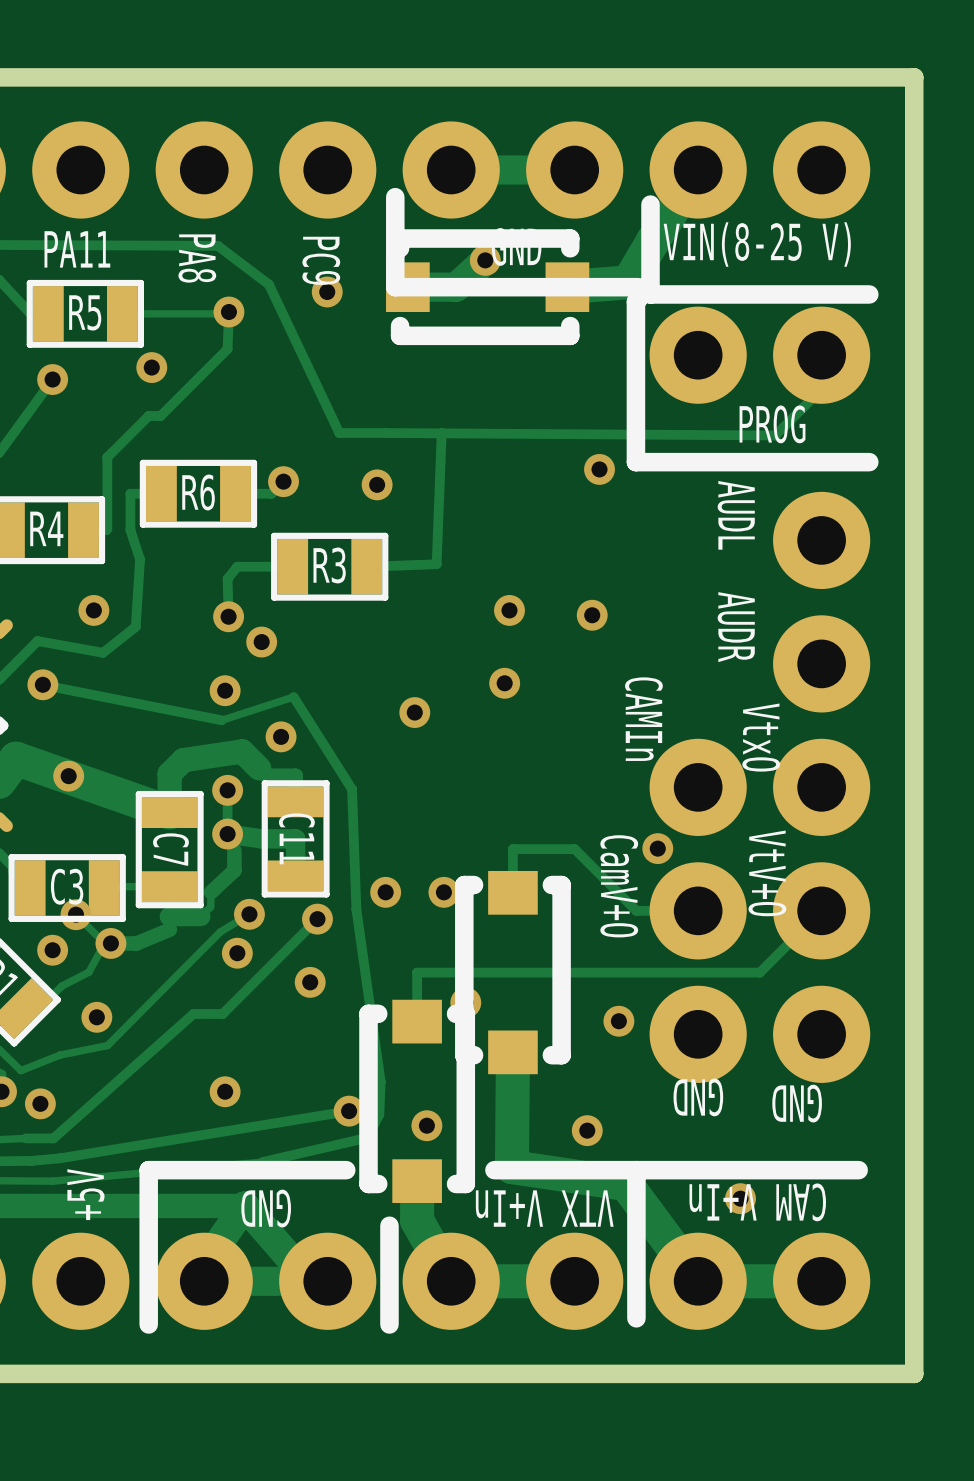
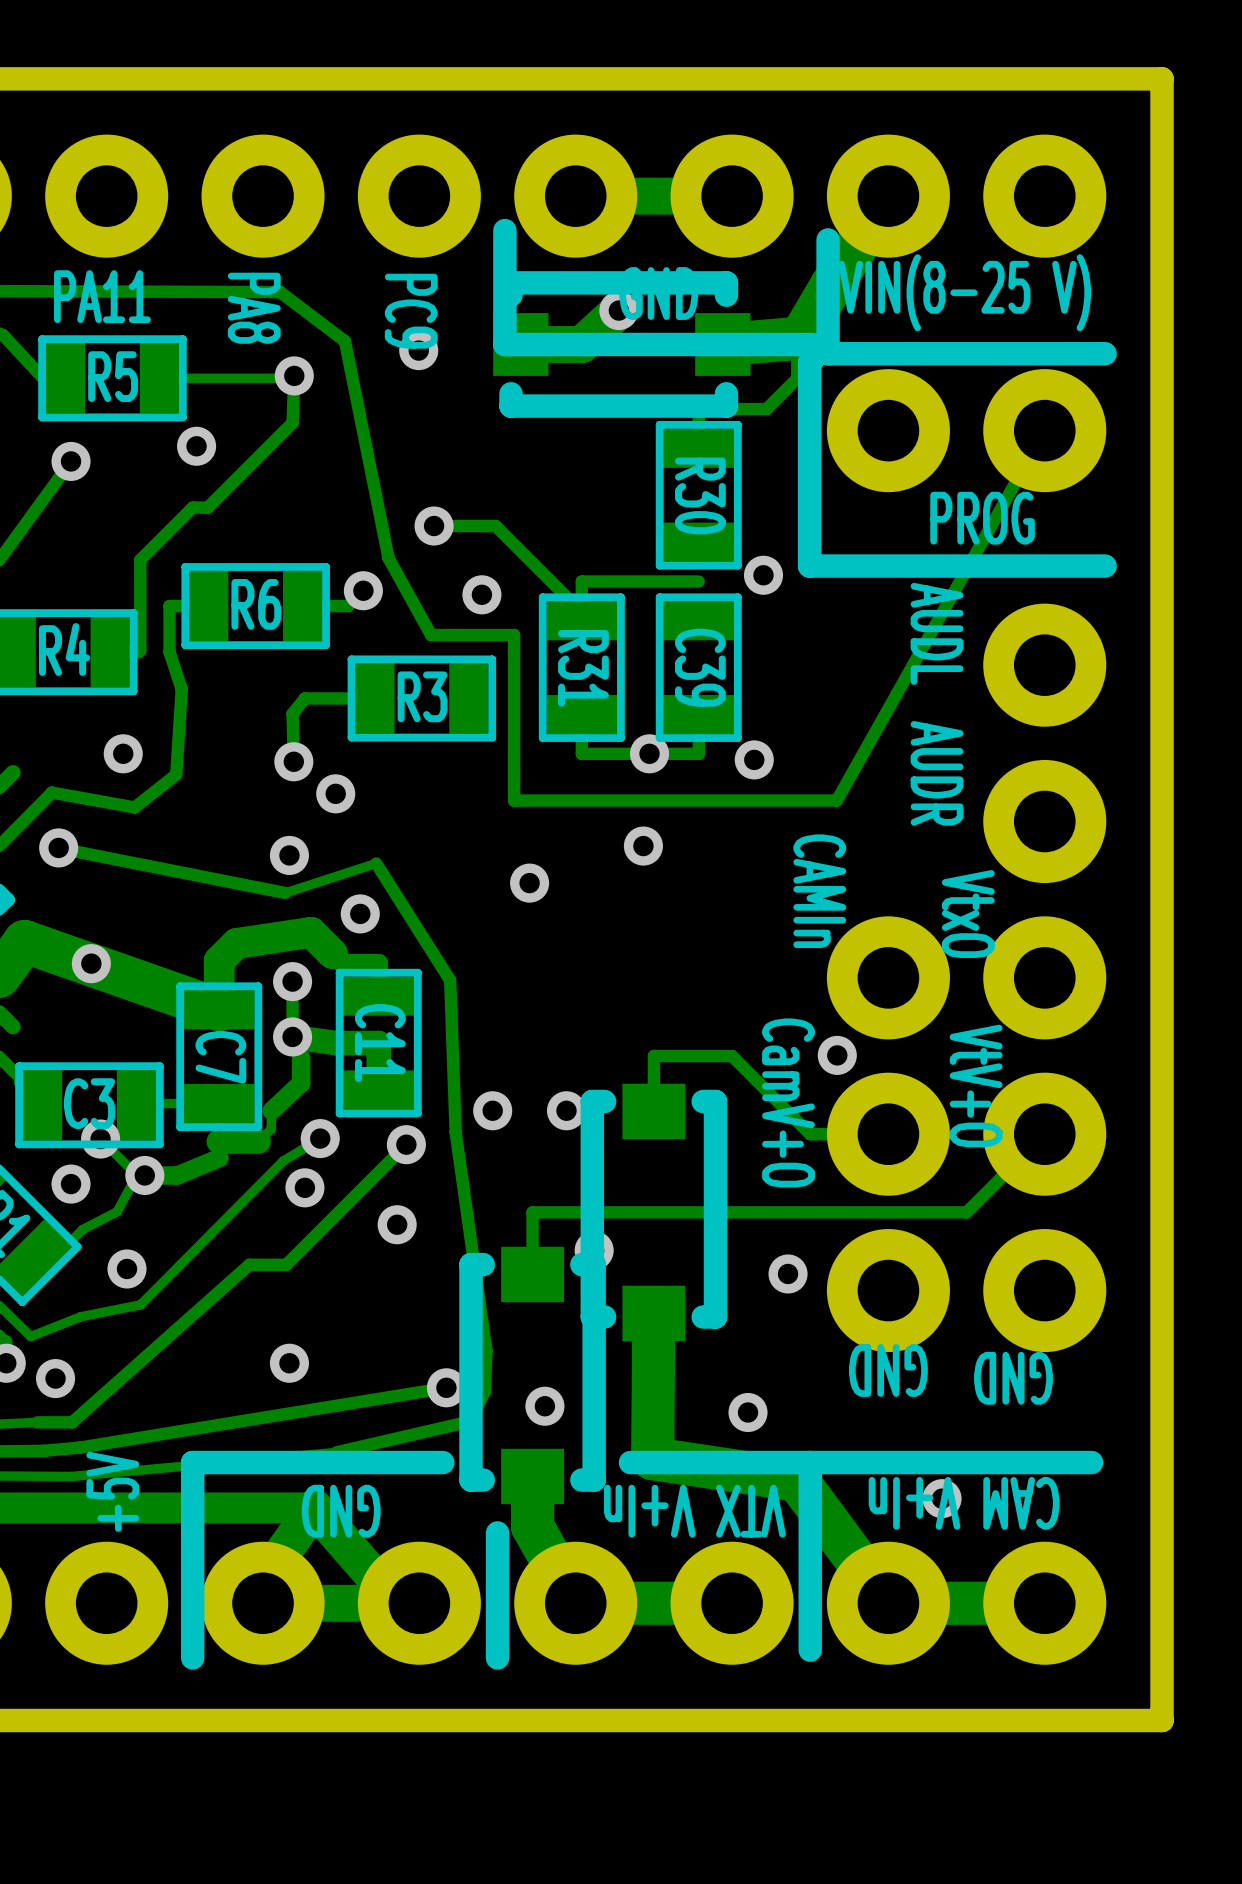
track: none -> (797, 338) (797, 378) (766, 409) (705, 409) (698, 415) (698, 448)
track: (268, 284) (339, 433) (441, 433) -> none
track: (821, 355) (821, 389) (775, 435) (441, 433) -> (1044, 430) (836, 800) (514, 800) (514, 634) (431, 634) (388, 558) (344, 341)
R30: none -> (698, 495)
track: none -> (434, 526) (495, 526) (581, 612)
via: none -> (434, 526)
track: (441, 433) (436, 564) (366, 566) -> none
track: none -> (698, 581) (581, 581) (581, 620)
R31: none -> (581, 667)
C39: none -> (698, 667)
track: none -> (698, 714) (698, 753) (581, 753) (581, 714)

